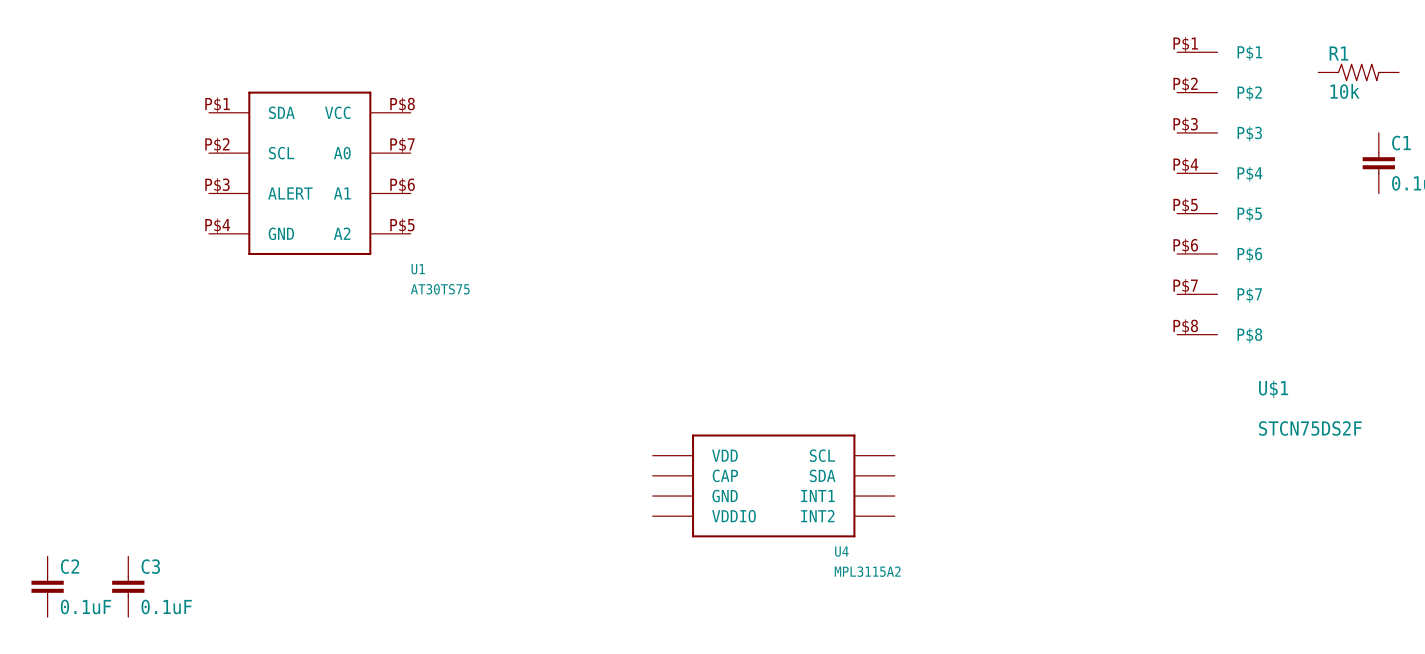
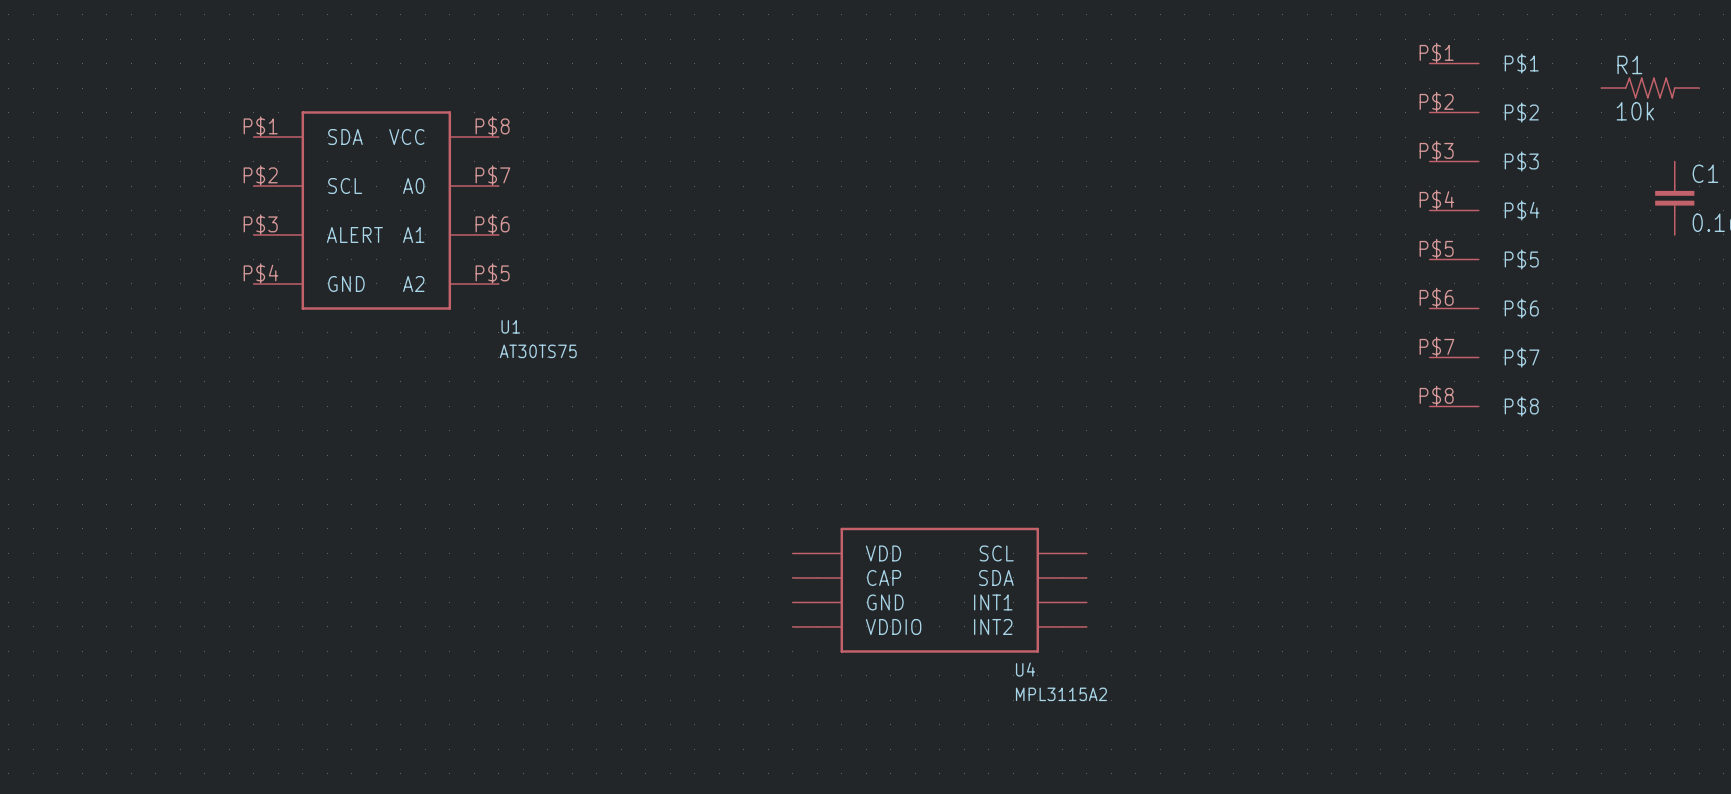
U$1 name: U$1 (1273, 389) -> none
U$1 value: STCN75DS2F (1310, 428) -> none
C2: 0.1uF (47, 586) -> none
C3: 0.1uF (128, 586) -> none

